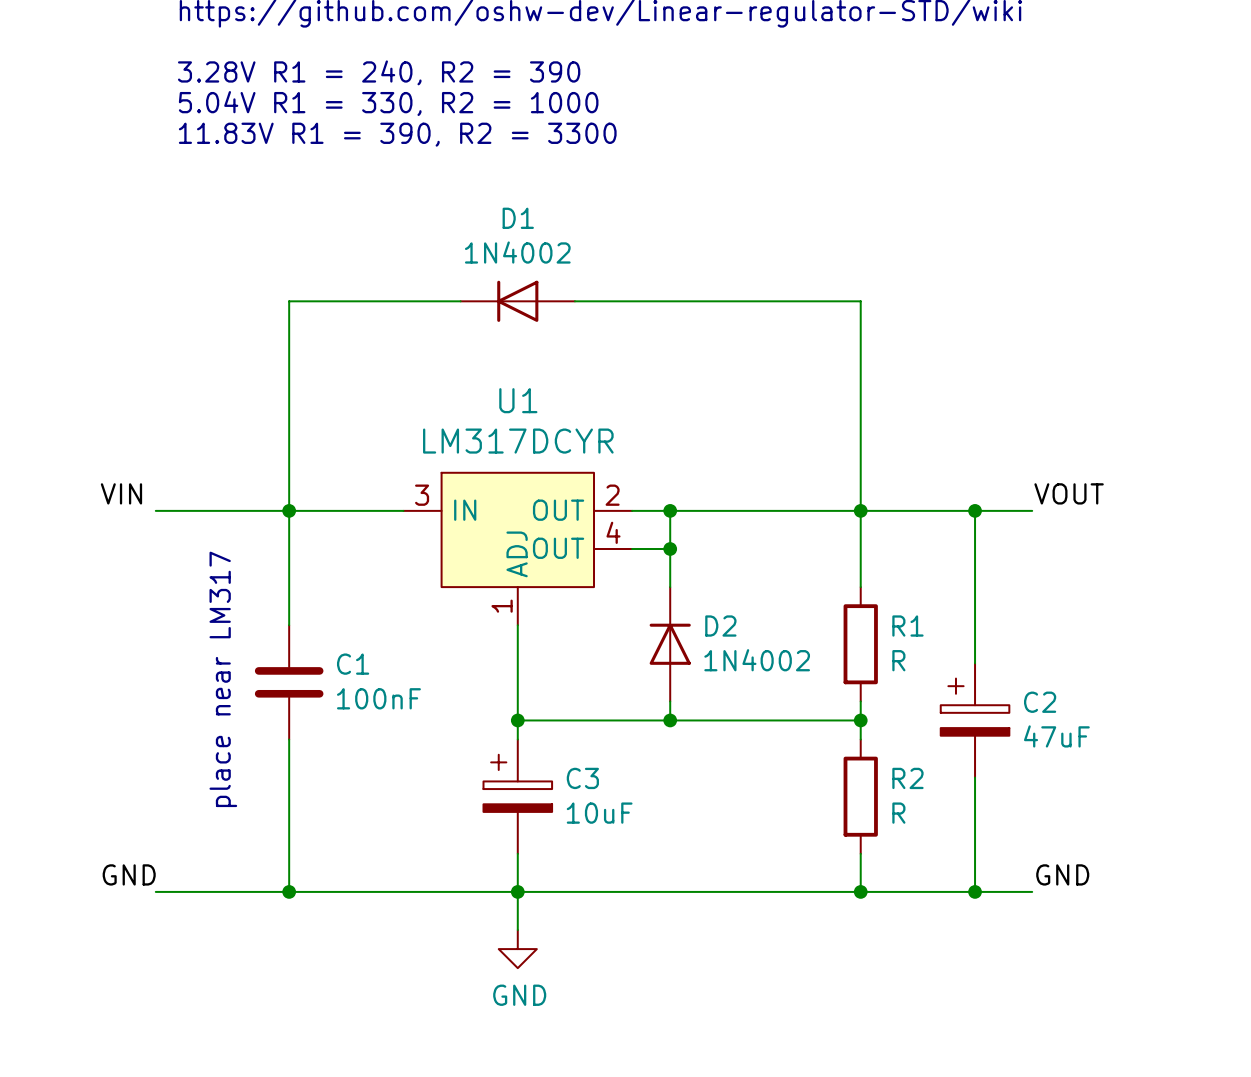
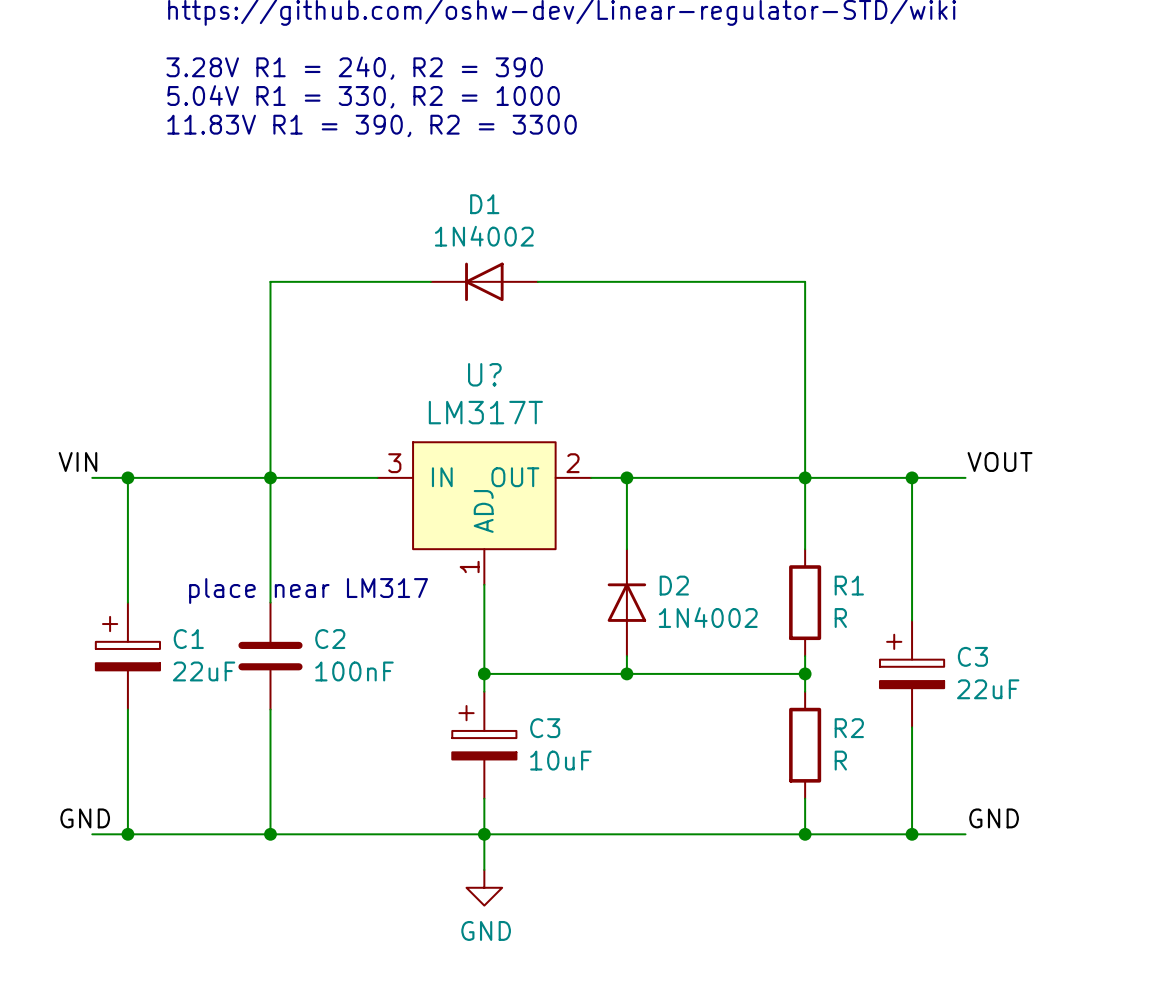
label position: VIN (121, 493) -> VIN (77, 461)
wire: none -> (92, 477) (145, 477)
wire: none -> (127, 477) (127, 602)
junction: none -> (127, 477)
U1: LM317DCYR (517, 549) -> none
U?: none -> LM317T (484, 513)
wire: (632, 549) (670, 549) -> none
junction: (670, 549) -> none
C1 symbol: [254, 625, 324, 740] -> [95, 602, 161, 710]
text rotation: 0° (223, 679) -> 90° clockwise (308, 591)
C1 value: 100nF (378, 698) -> 22uF (204, 671)
C2: none -> 100nF (270, 656)
C2 name: C2 (1040, 702) -> C3 (972, 656)
C2 value: 47uF (1056, 736) -> 22uF (988, 689)
wire: none -> (127, 709) (127, 834)
label position: GND (129, 874) -> GND (85, 818)
wire: none -> (92, 834) (145, 834)
junction: none -> (127, 834)

